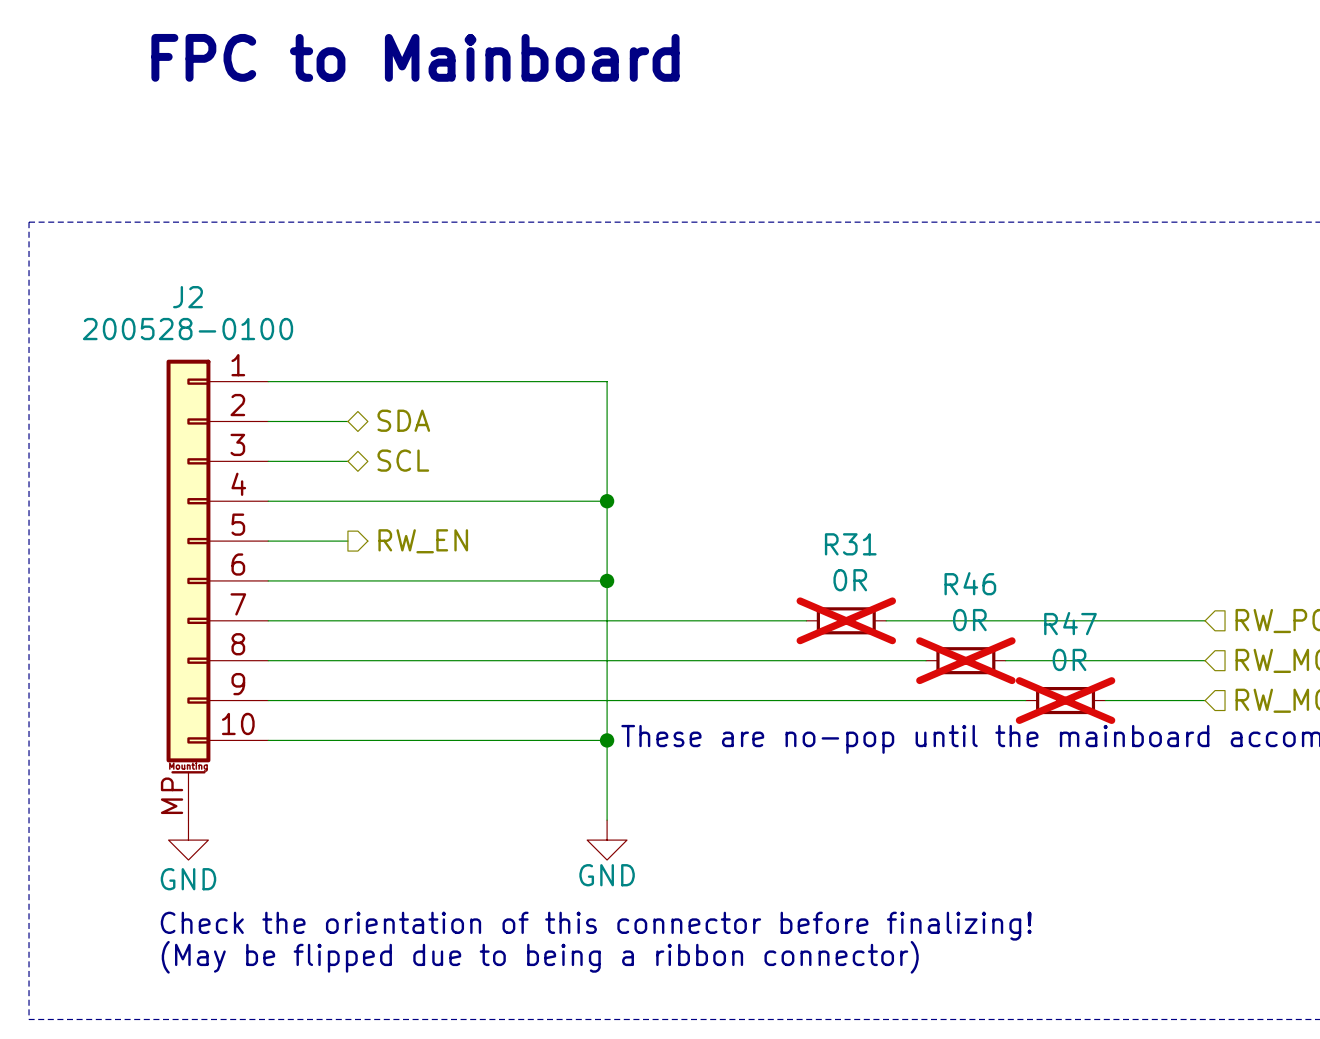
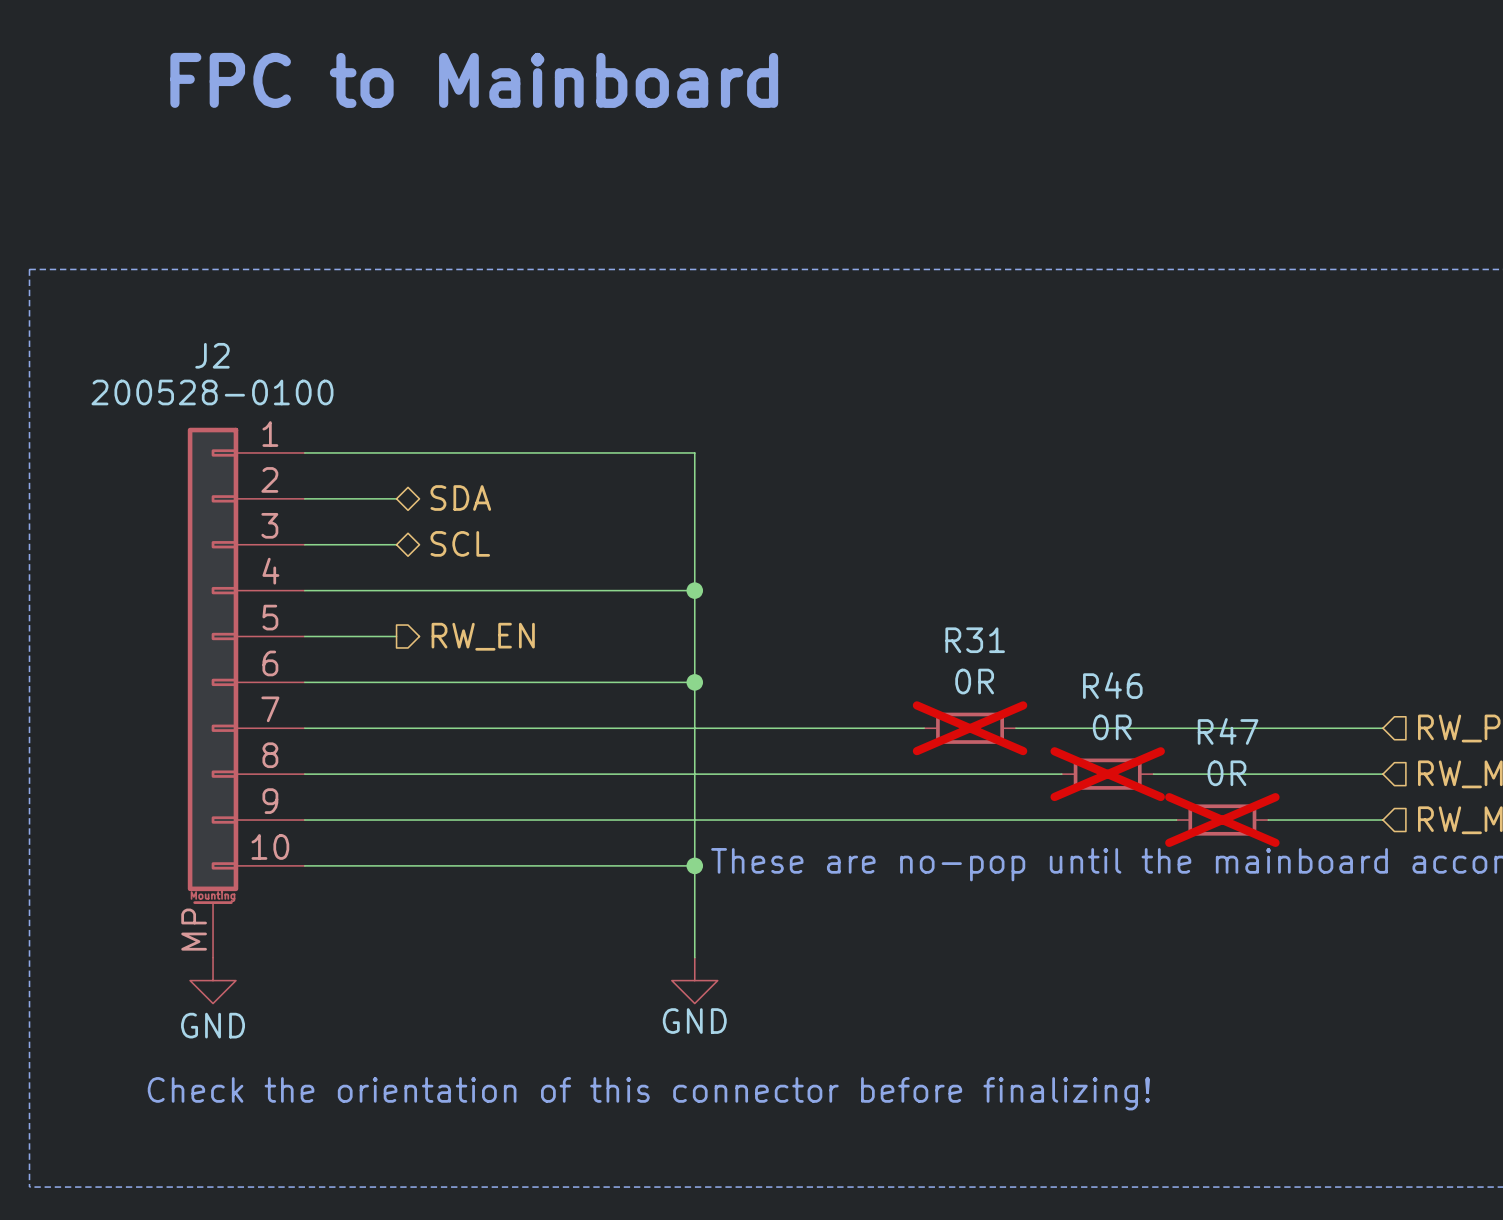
text: Check the orientation of this connector before finalizing! (596, 926) -> none
text: none -> Check the orientation of this connector before finalizing! (648, 1093)
text: (May be flipped due to being a ribbon connector) (540, 957) -> none

